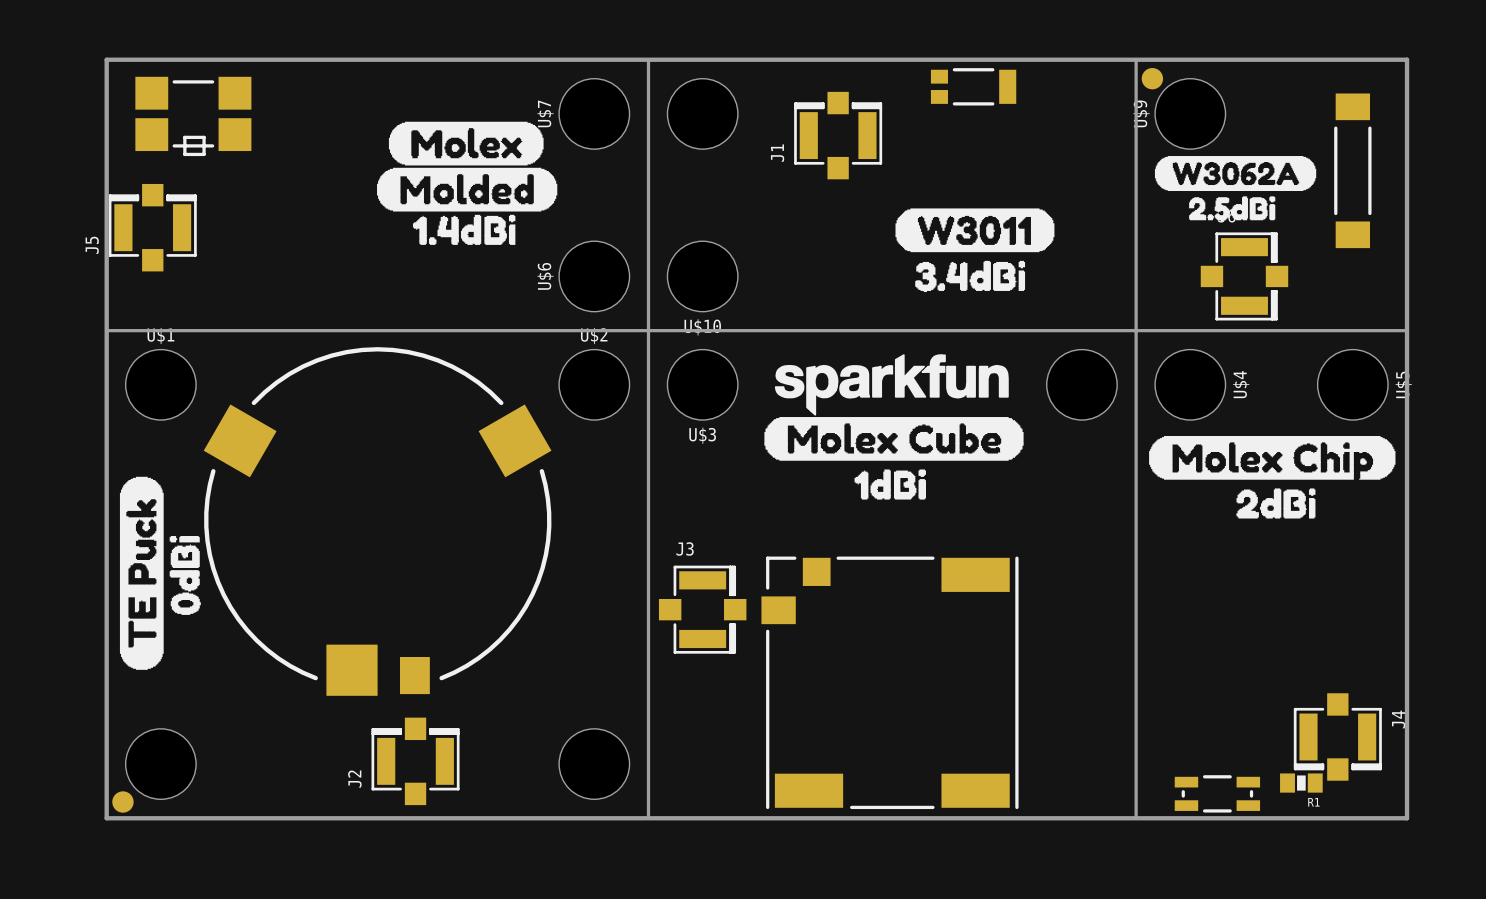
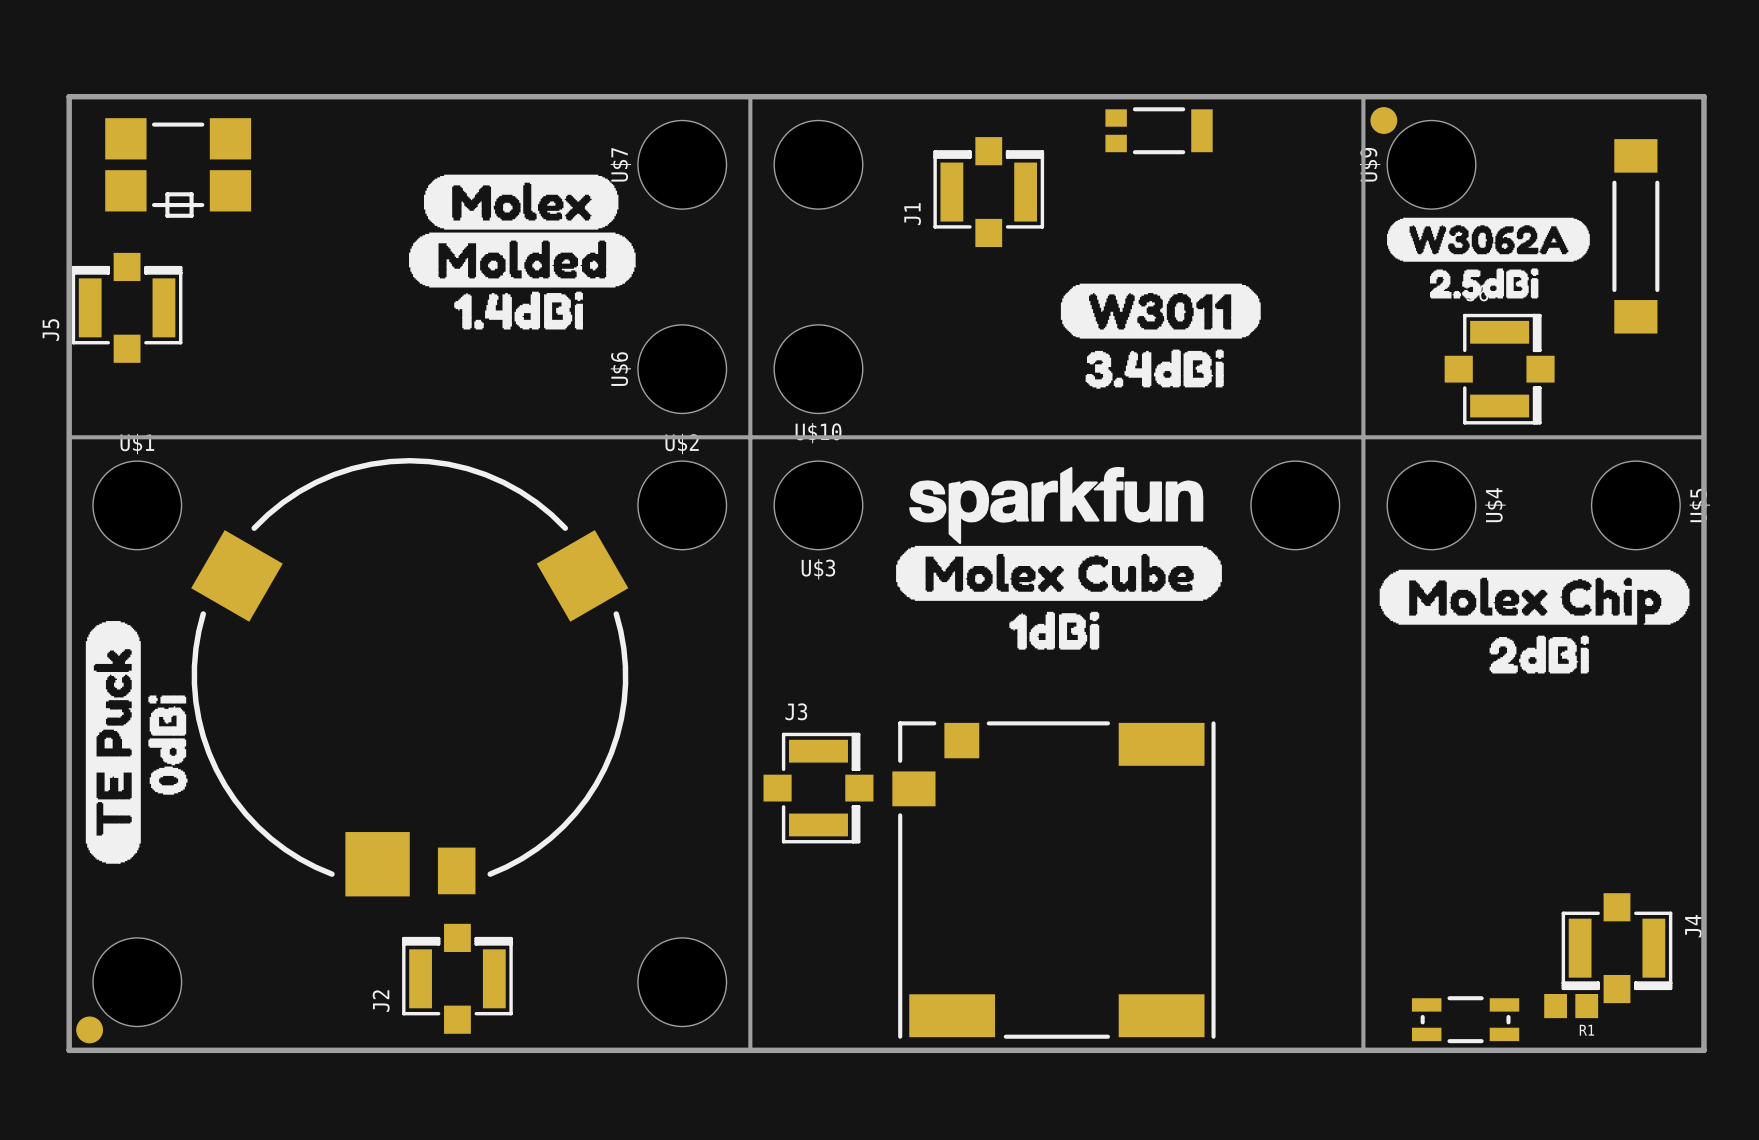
R1 footprint: [1280, 773, 1323, 793] -> [1544, 993, 1599, 1019]

